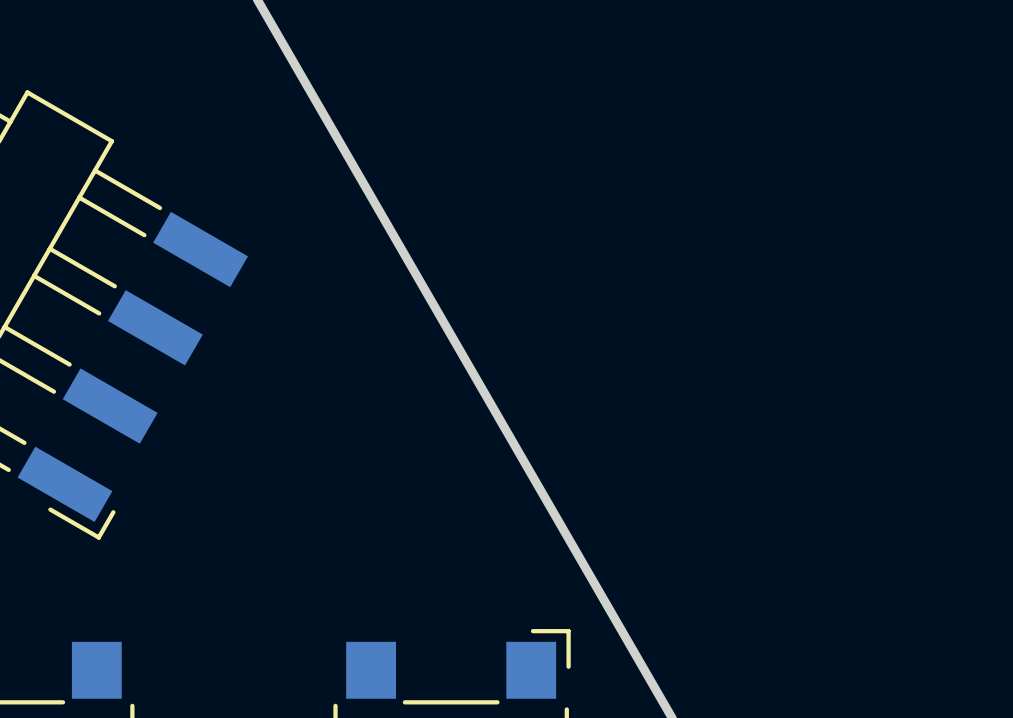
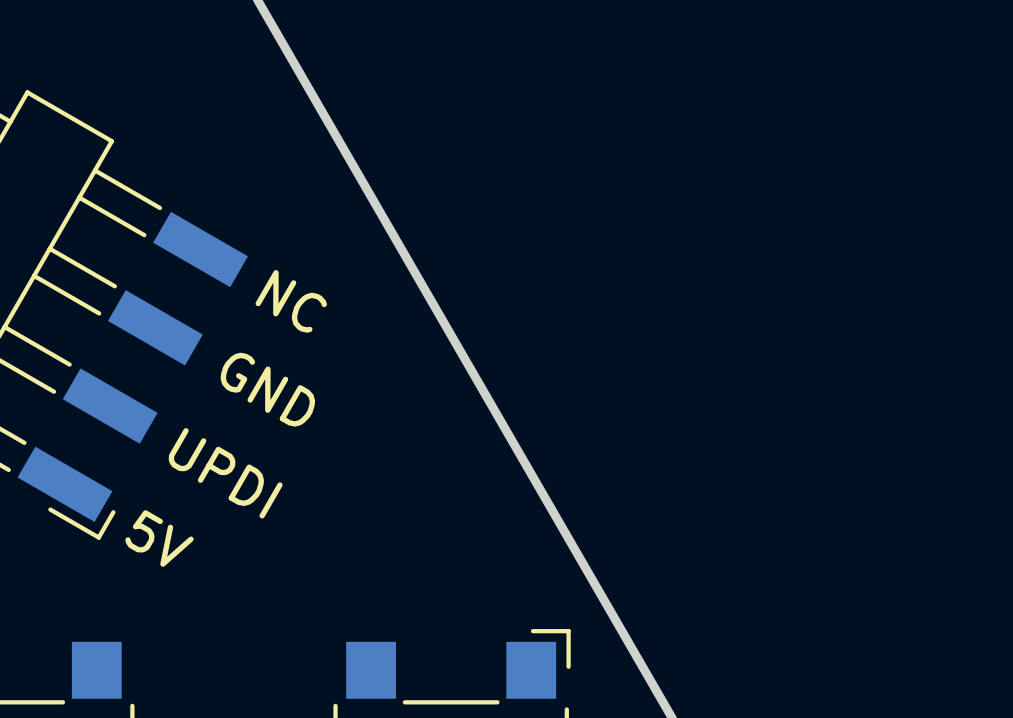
text: none -> NC (291, 301)
text: none -> GND (267, 389)
text: none -> UPDI (225, 473)
text: none -> 5V (159, 538)

